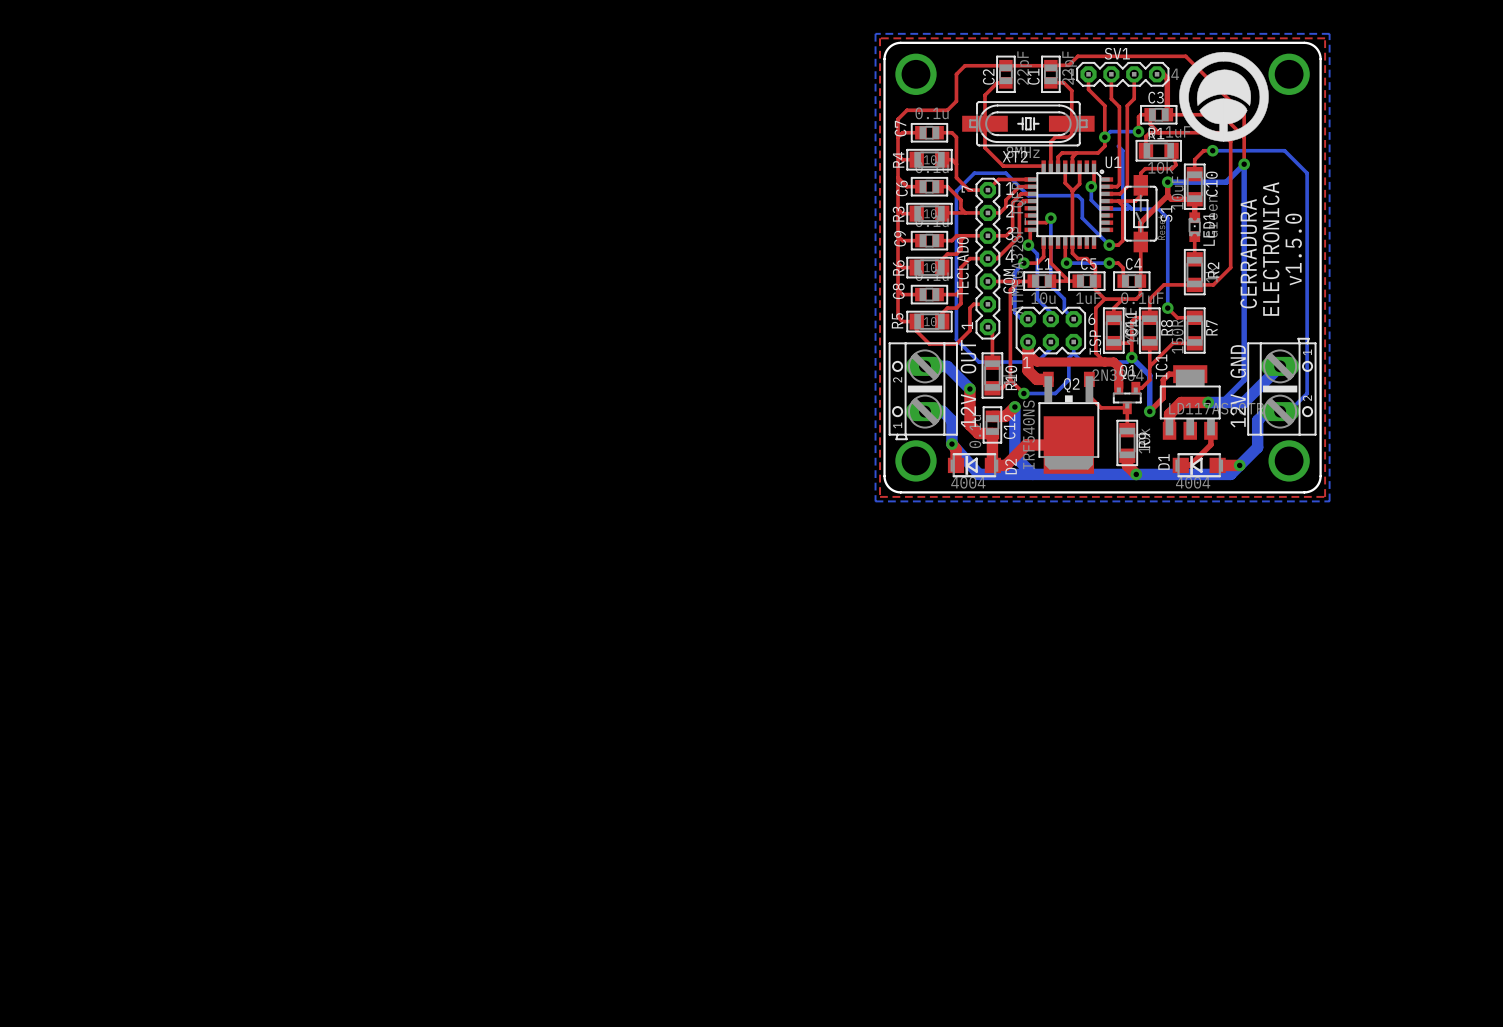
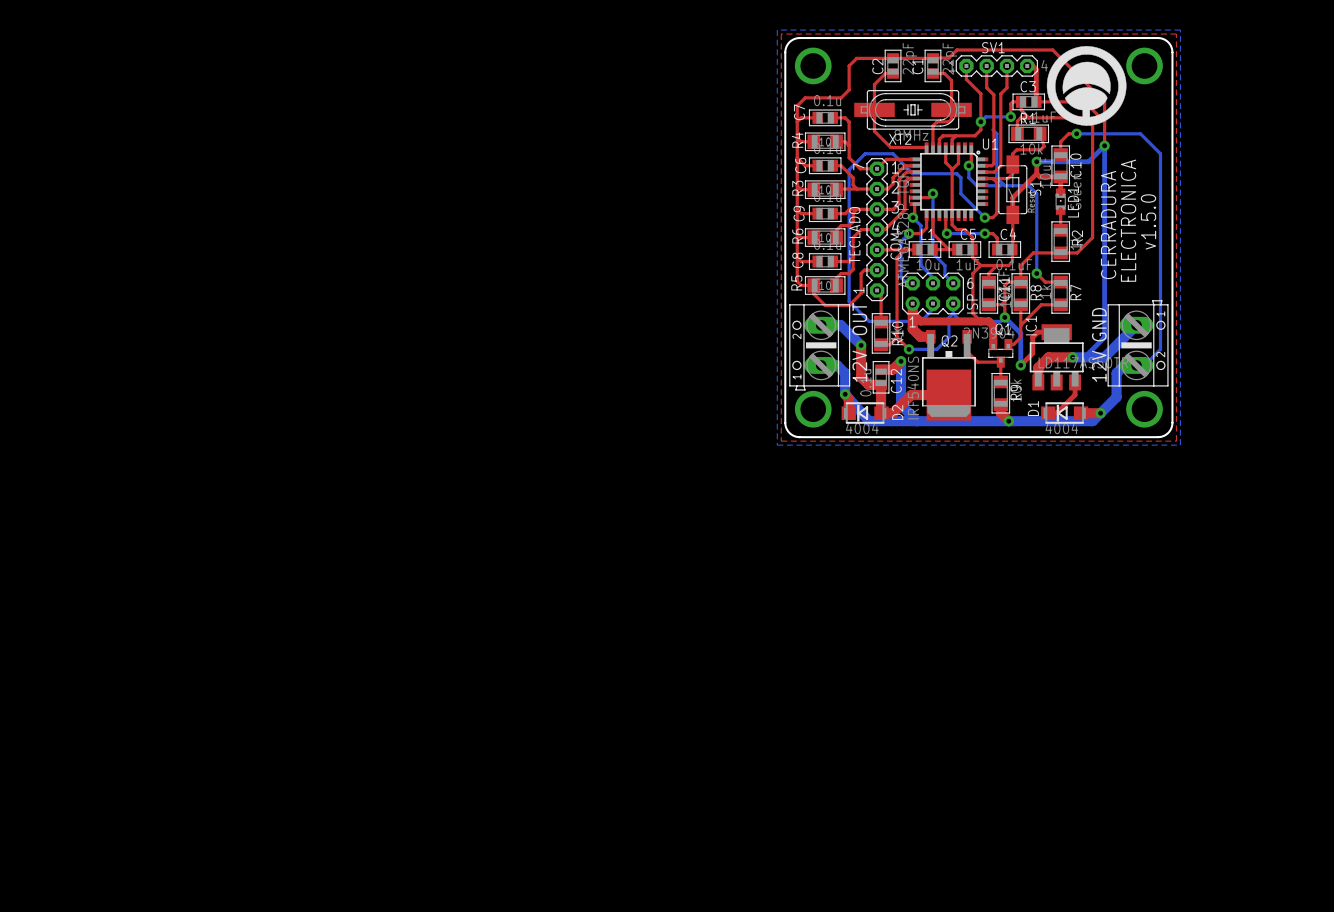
R7 value: 150R (1177, 336) -> 1k (1045, 291)

